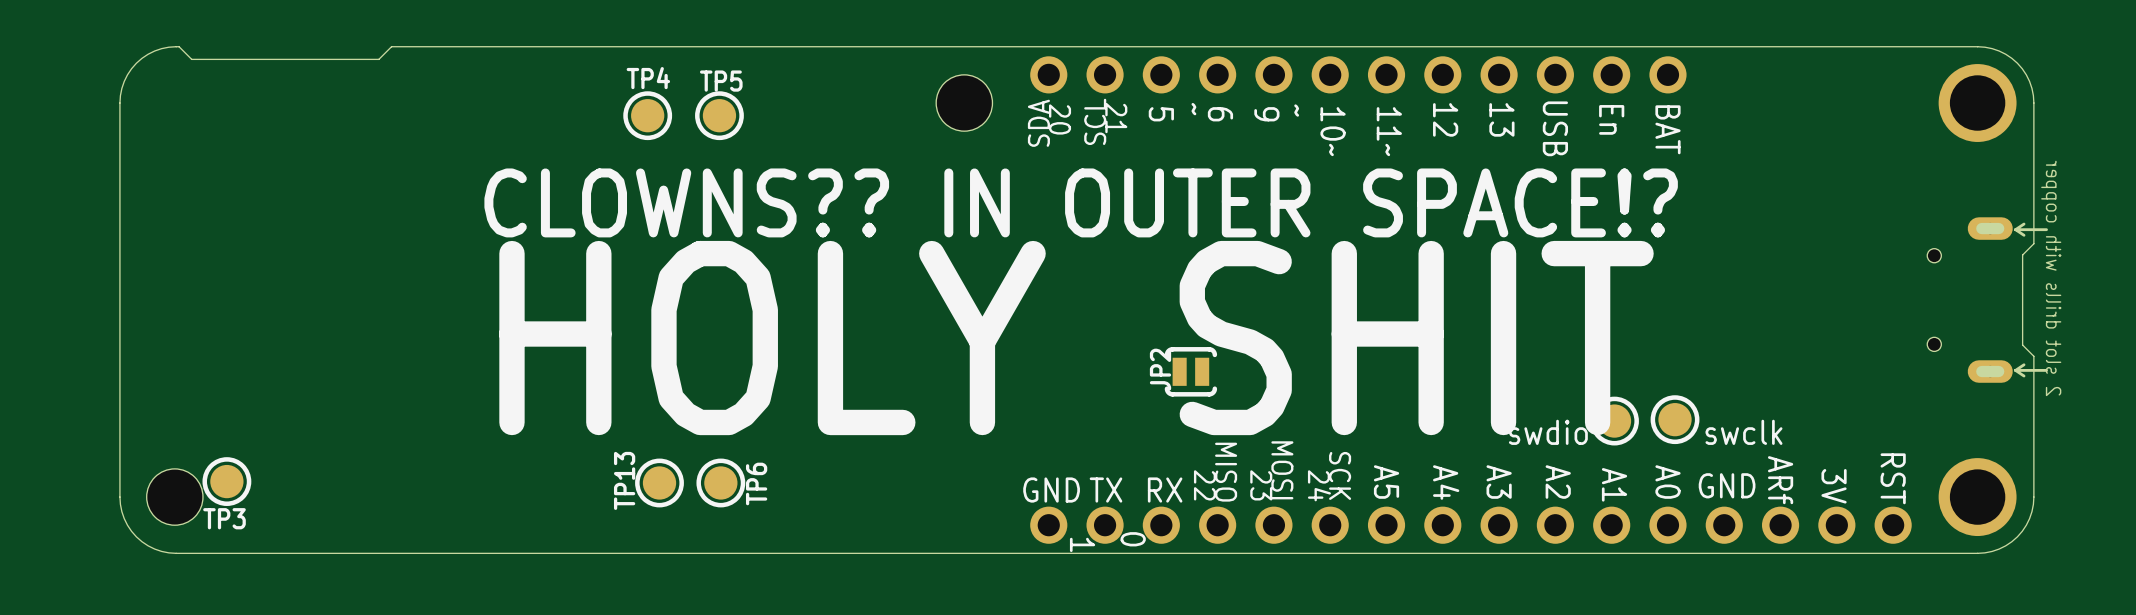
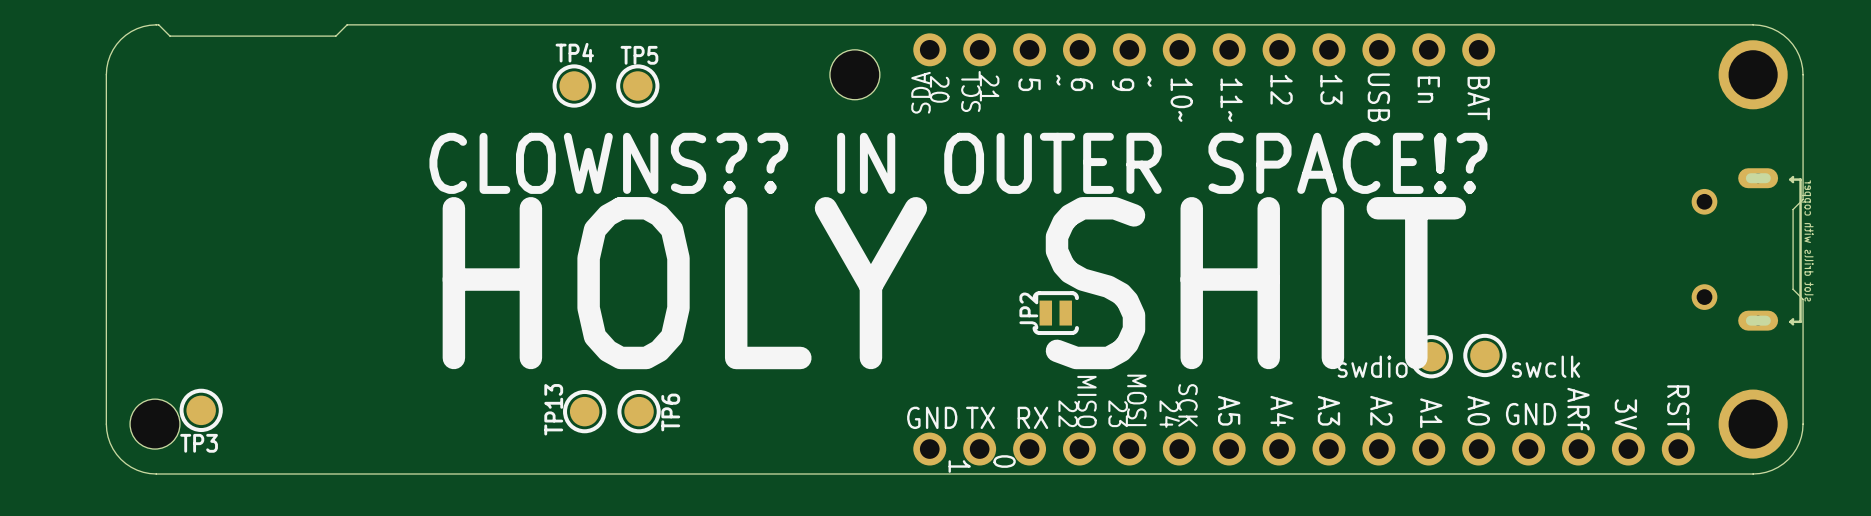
part footprint: [1927, 217, 2048, 383] -> [1691, 168, 1802, 331]

